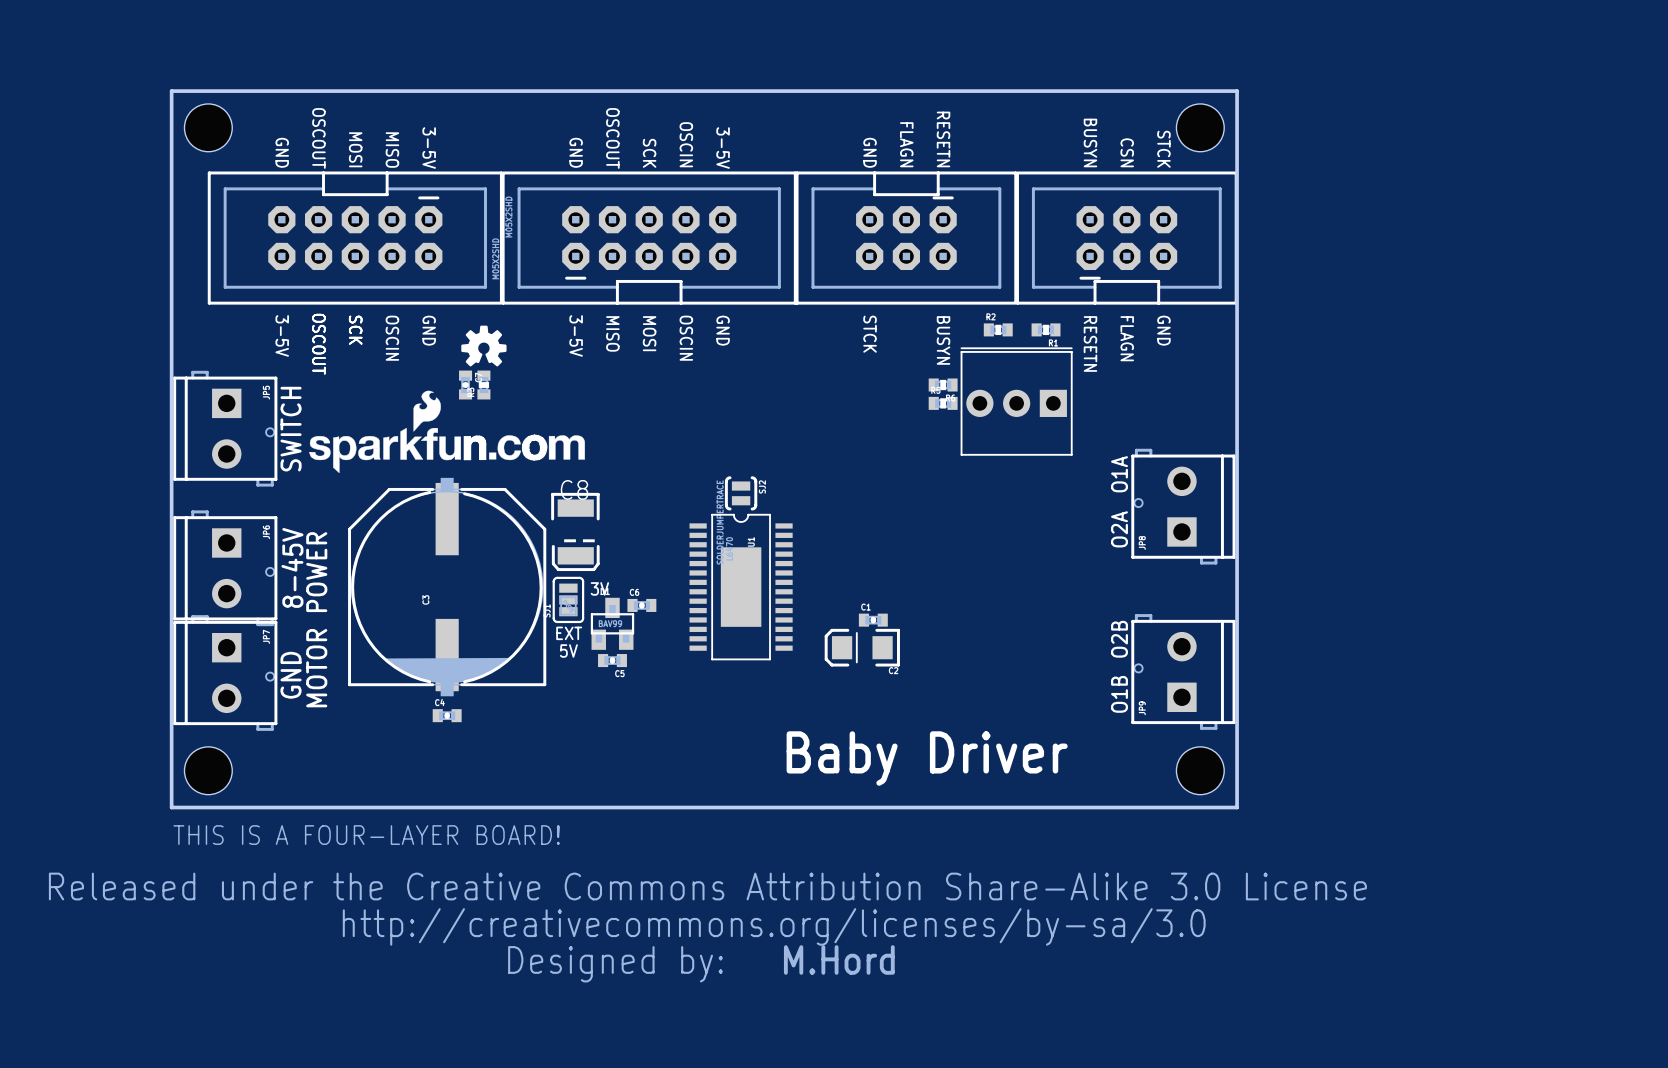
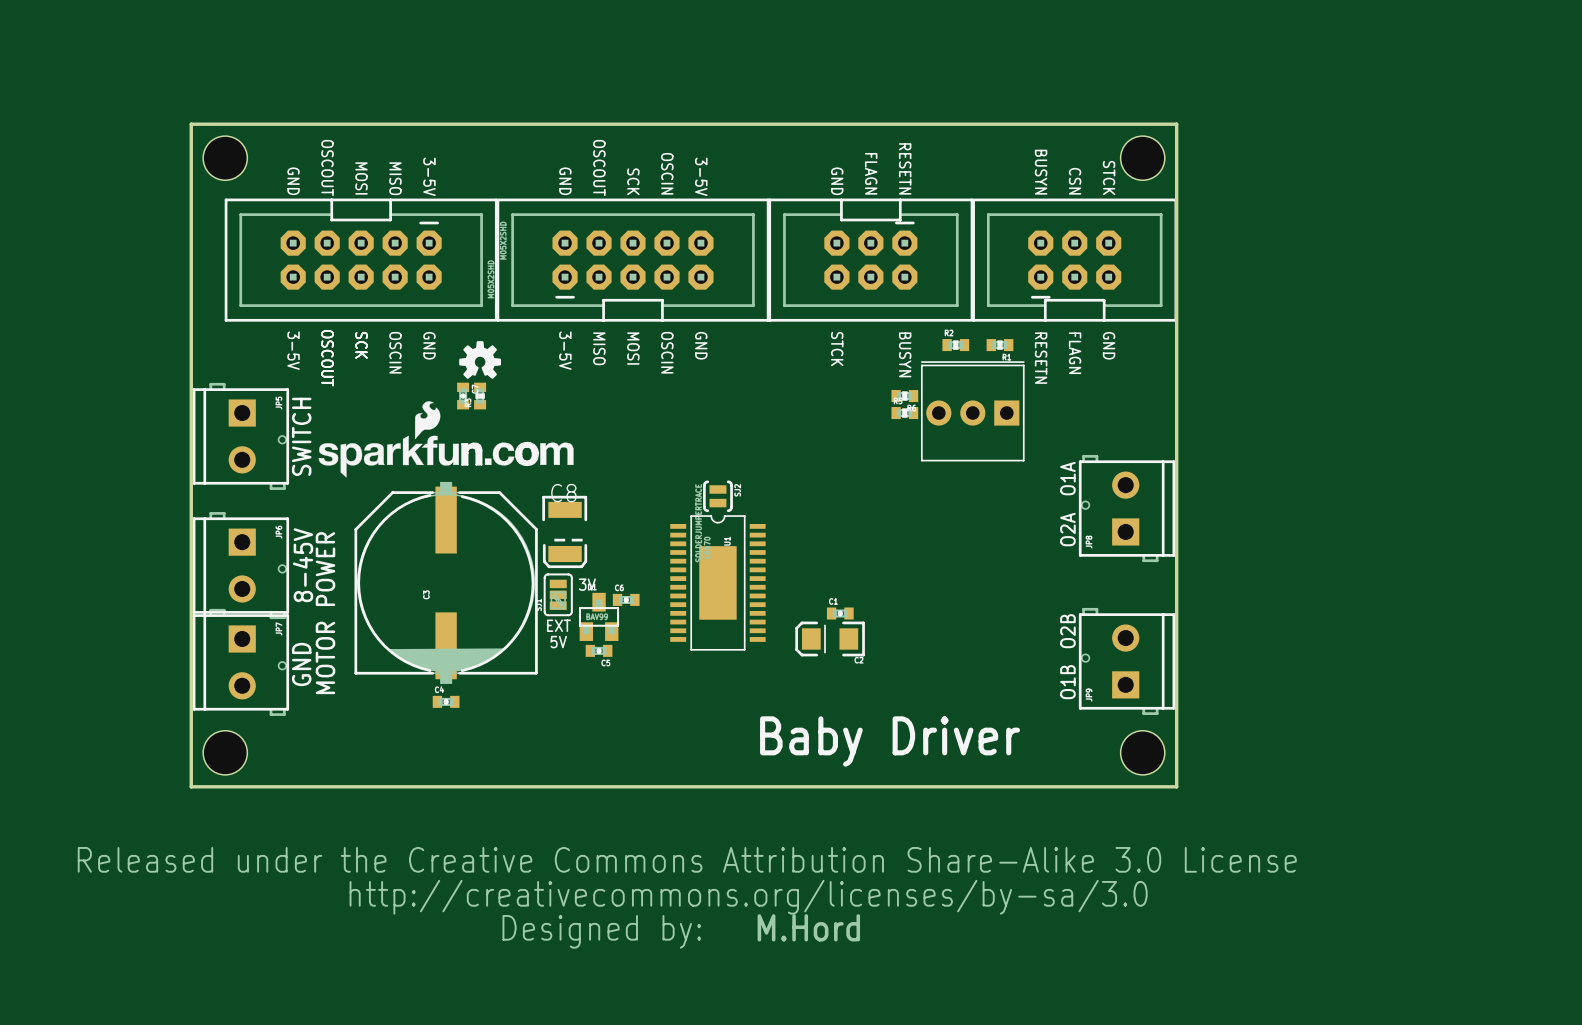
drawing: [173, 825, 560, 845] -> none

